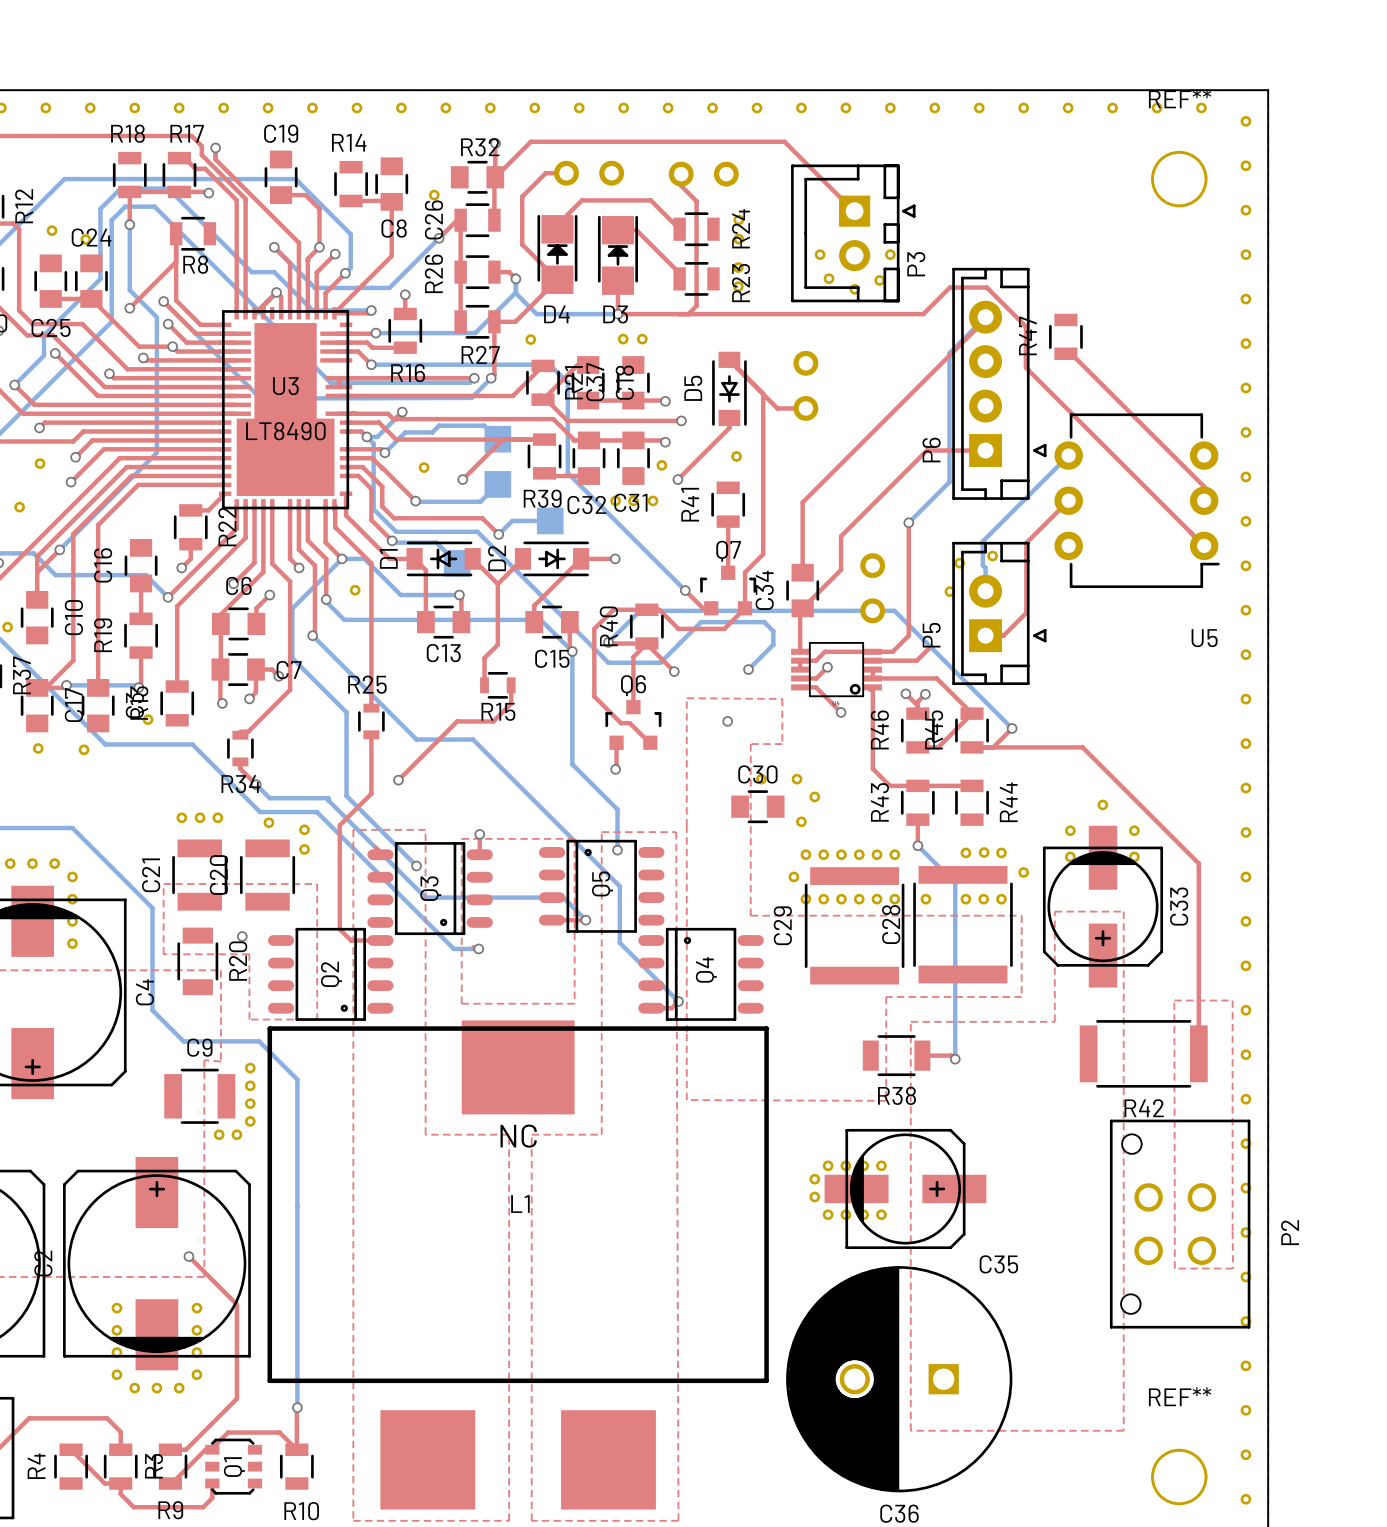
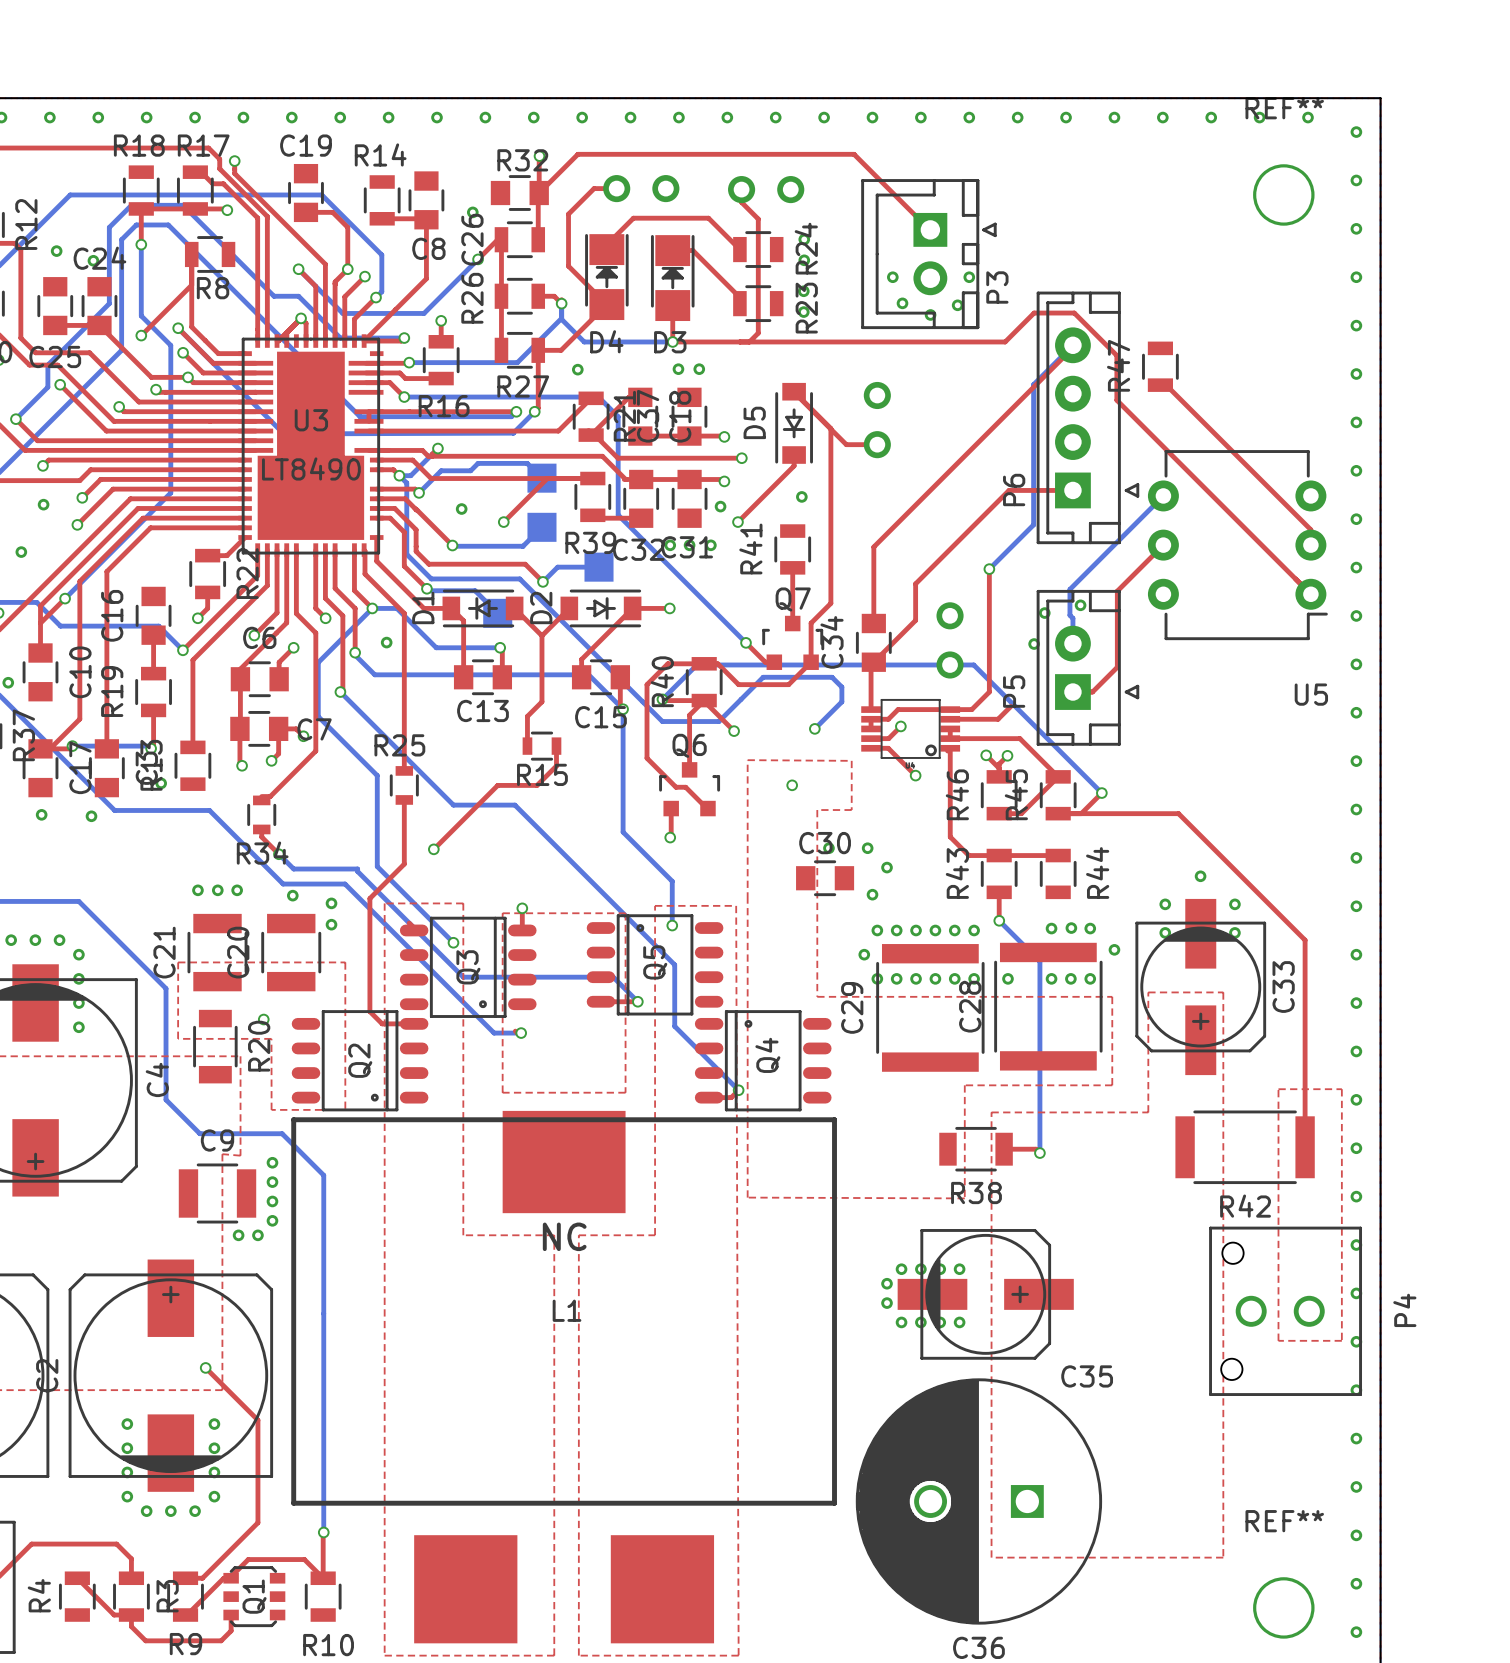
top zone outline: (1174, 1000) (1174, 1268) (1233, 1268) (1232, 1231) -> (1278, 1089) (1278, 1340) (1341, 1340)
P4: none -> (1285, 1311)
P2: (1180, 1224) -> none

